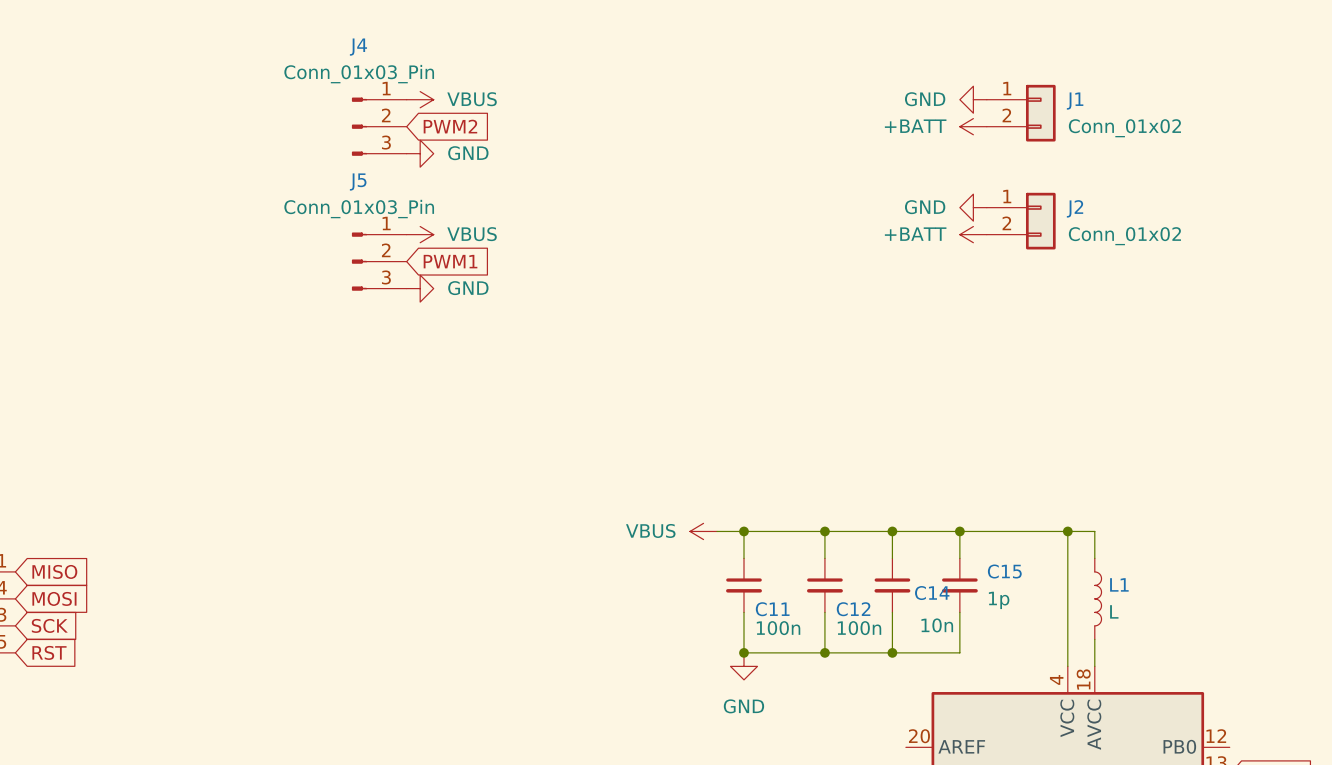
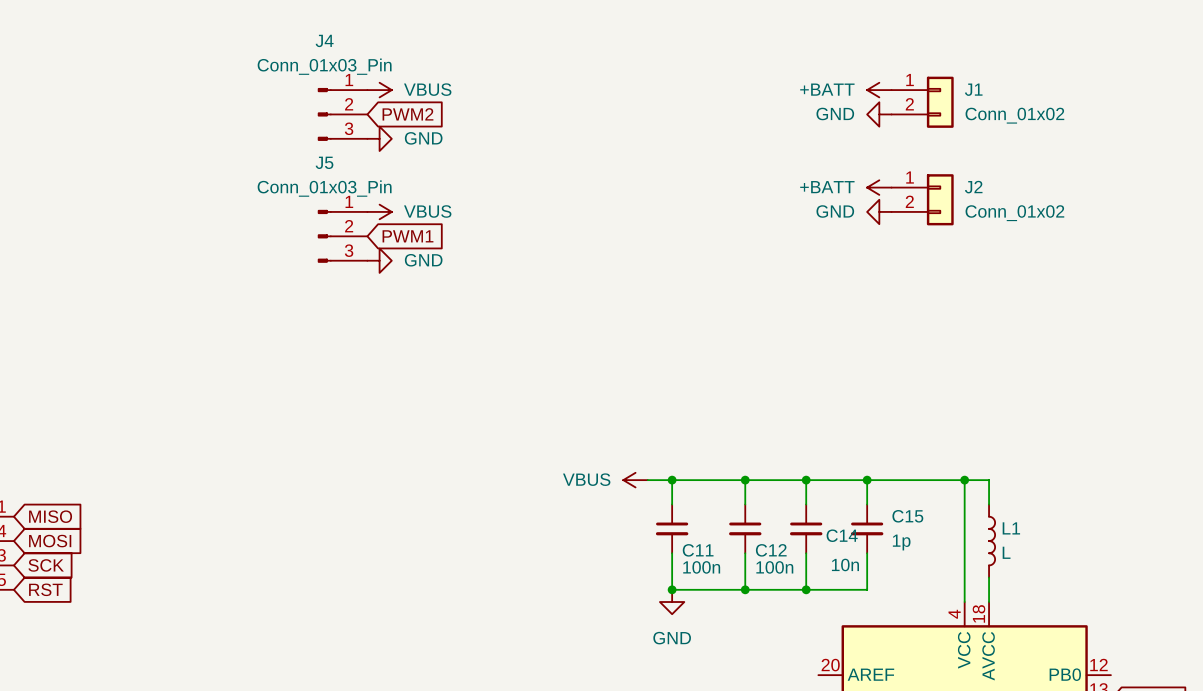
power symbol: GND (973, 99) -> +BATT (879, 90)
power symbol: +BATT (973, 126) -> GND (879, 114)
power symbol: GND (973, 207) -> +BATT (879, 187)
power symbol: +BATT (973, 234) -> GND (879, 211)

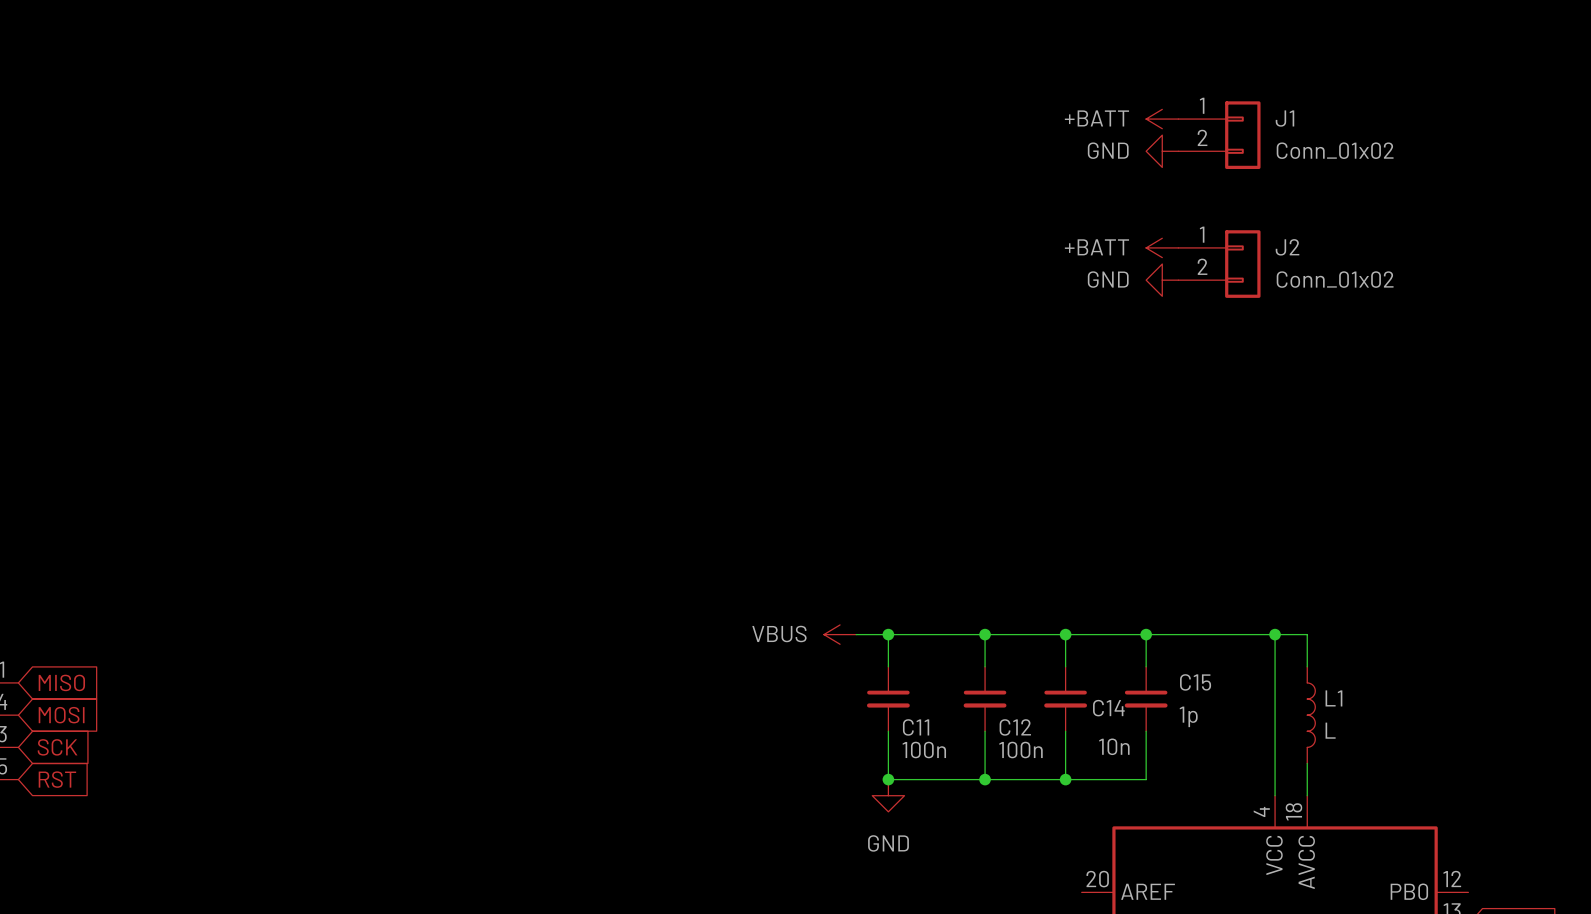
power symbol: VBUS (379, 90) -> none
J4: Conn_01x03_Pin (342, 114) -> none
global label: PWM2 (407, 114) -> none
power symbol: GND (379, 138) -> none
power symbol: VBUS (379, 211) -> none
J5: Conn_01x03_Pin (342, 236) -> none
global label: PWM1 (407, 236) -> none
power symbol: GND (379, 260) -> none

